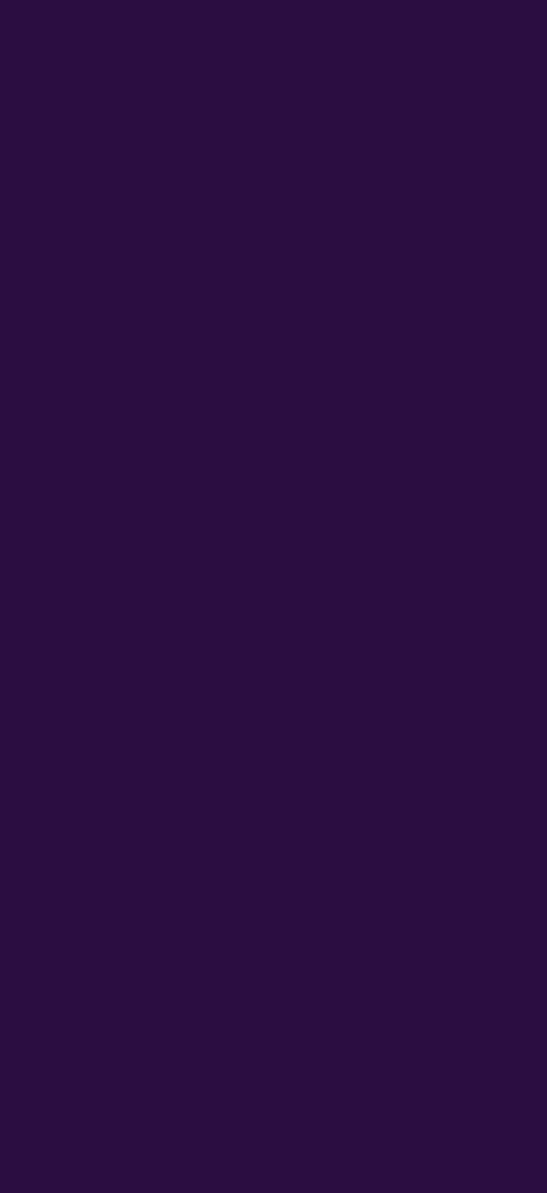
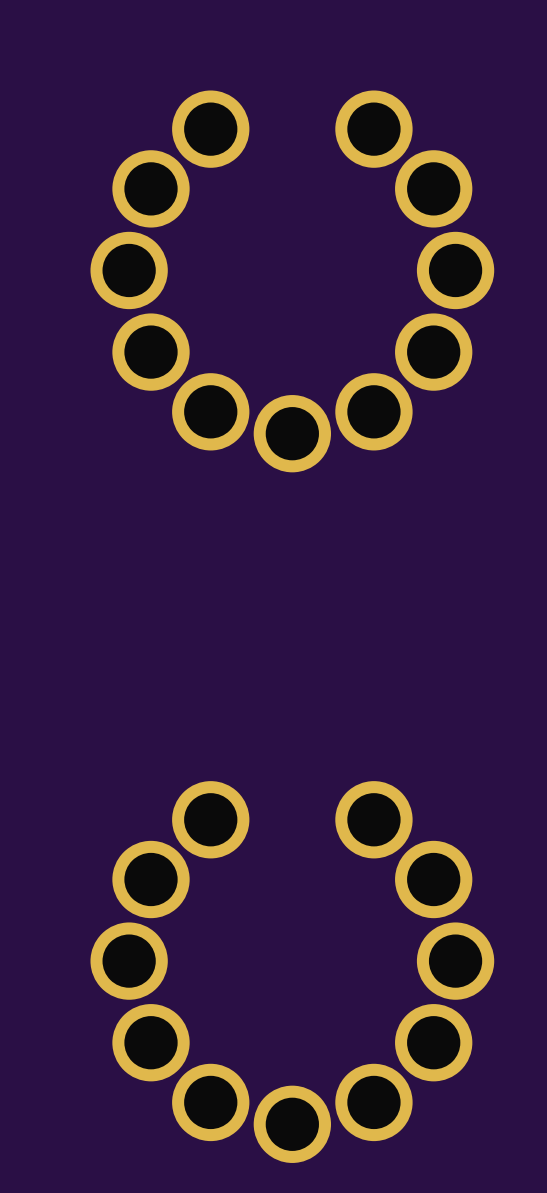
part: none -> (292, 281)
part: none -> (292, 972)

